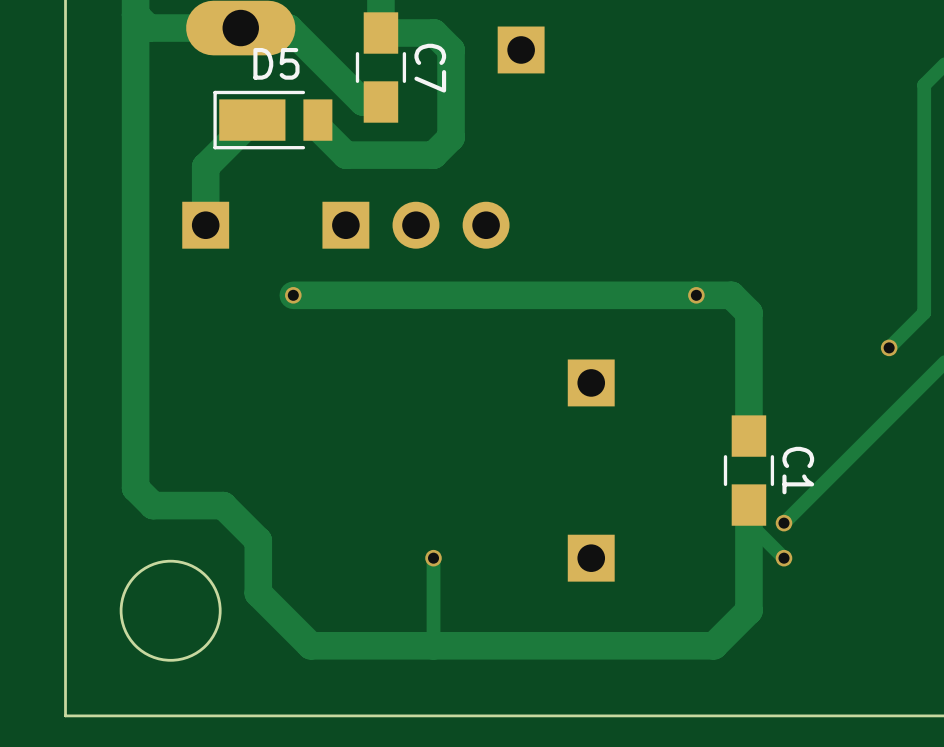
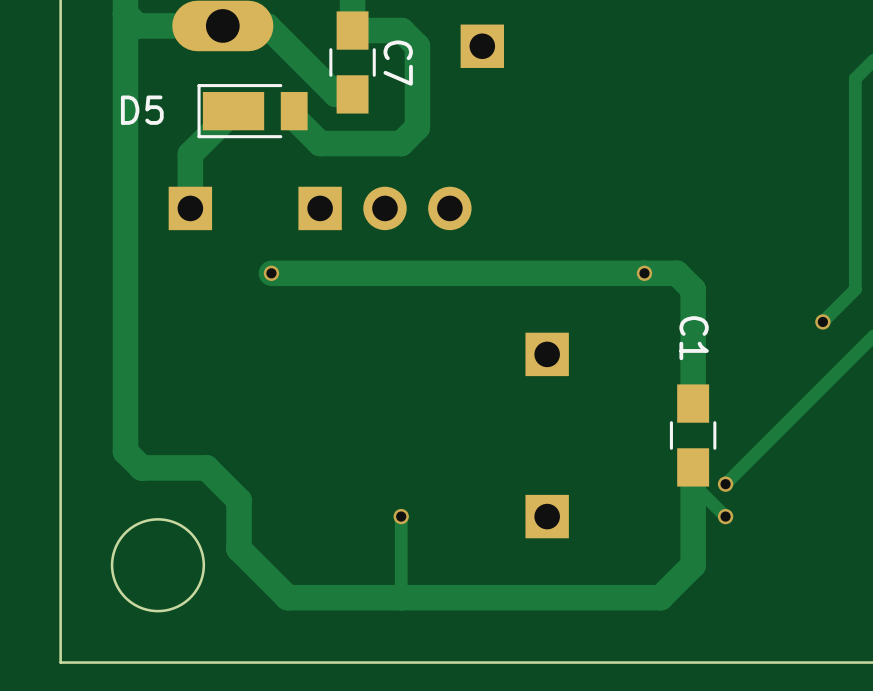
D5 name position: D5 (276, 63) -> D5 (142, 110)
C1 name position: C1 (798, 470) -> C1 (694, 338)

